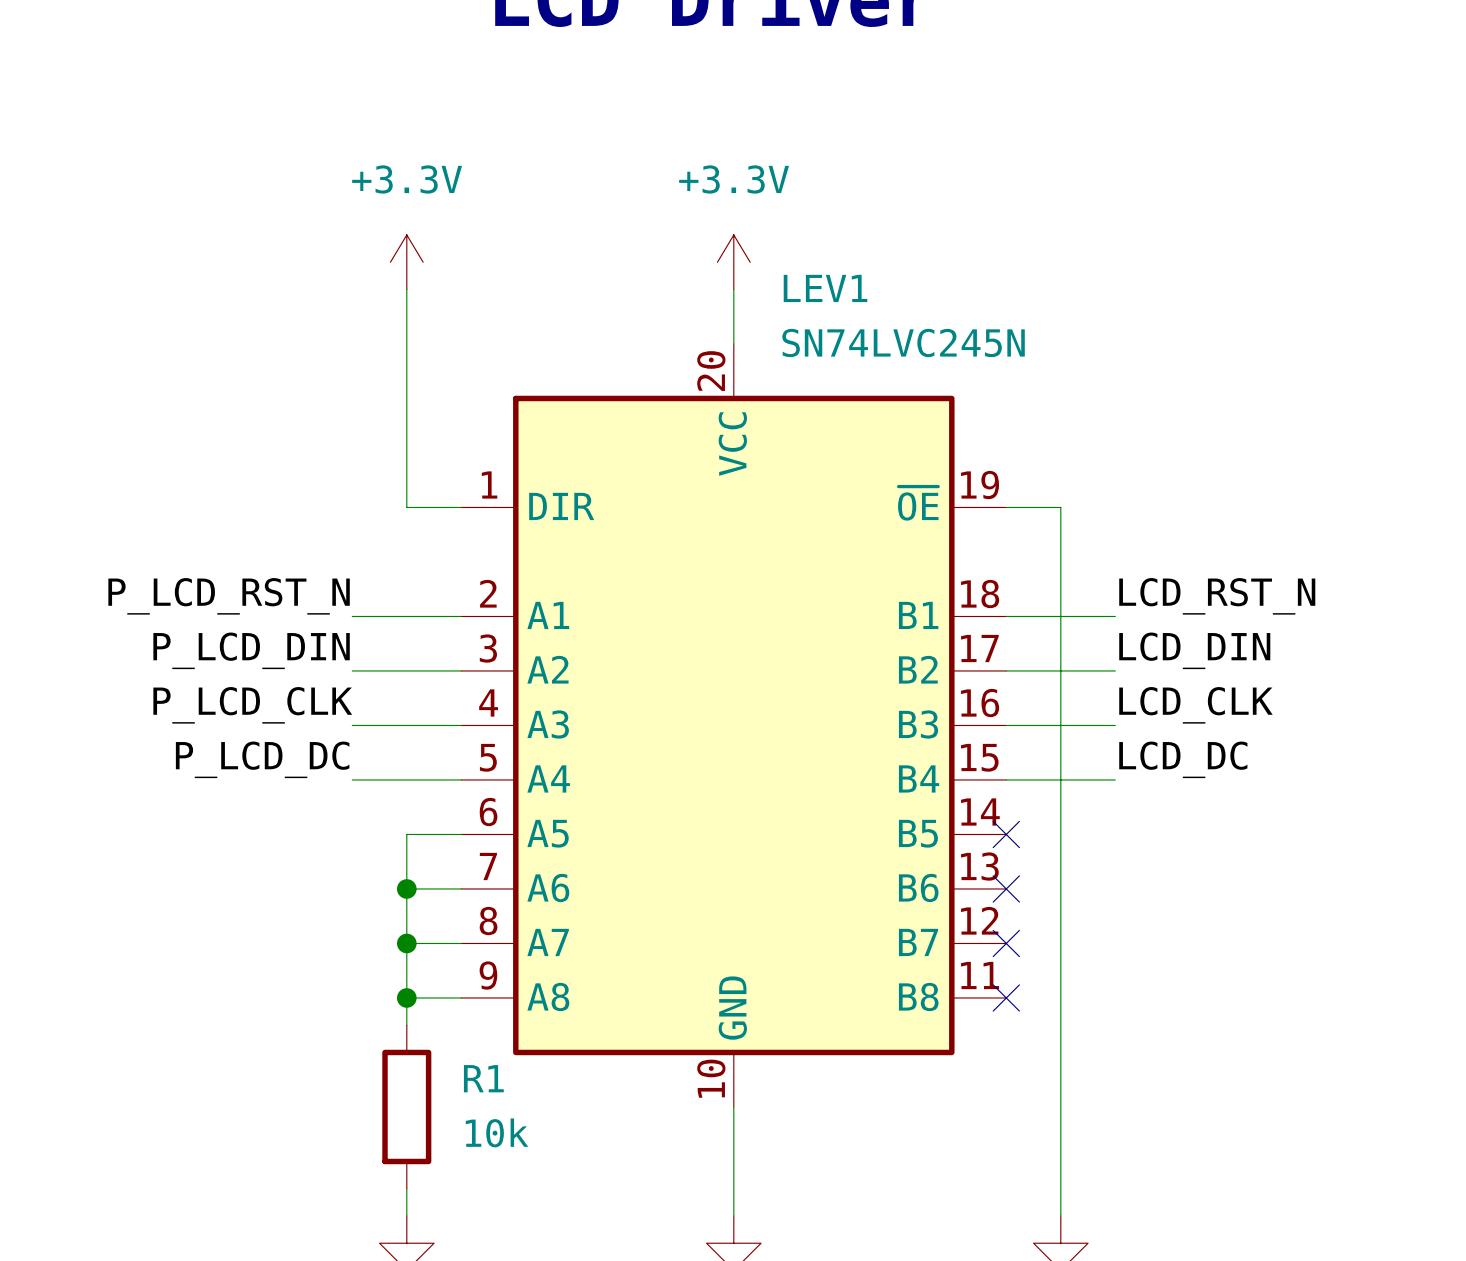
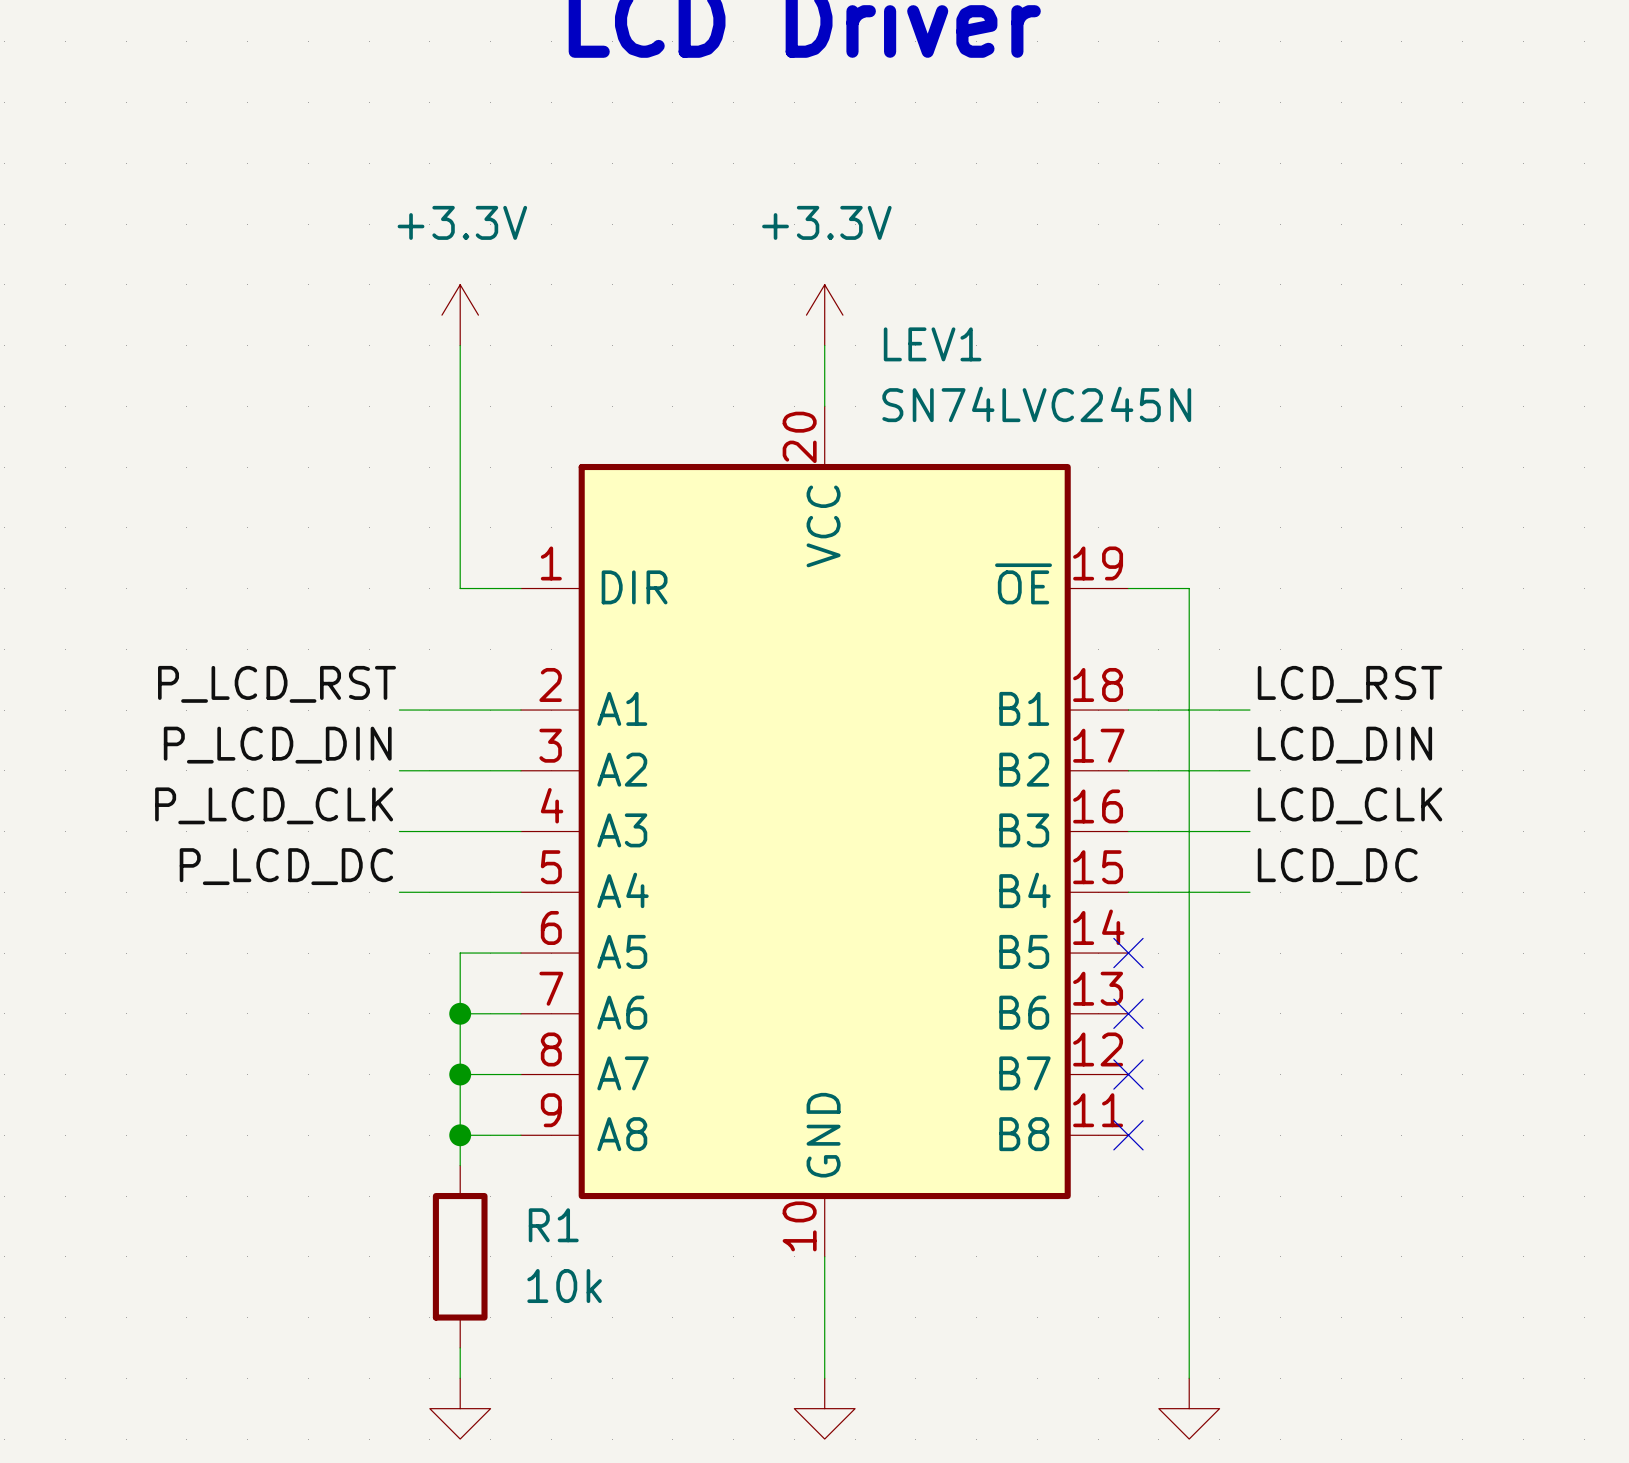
label: P_LCD_RST_N (229, 596) -> P_LCD_RST (277, 684)
label: LCD_RST_N (1217, 596) -> LCD_RST (1350, 684)

